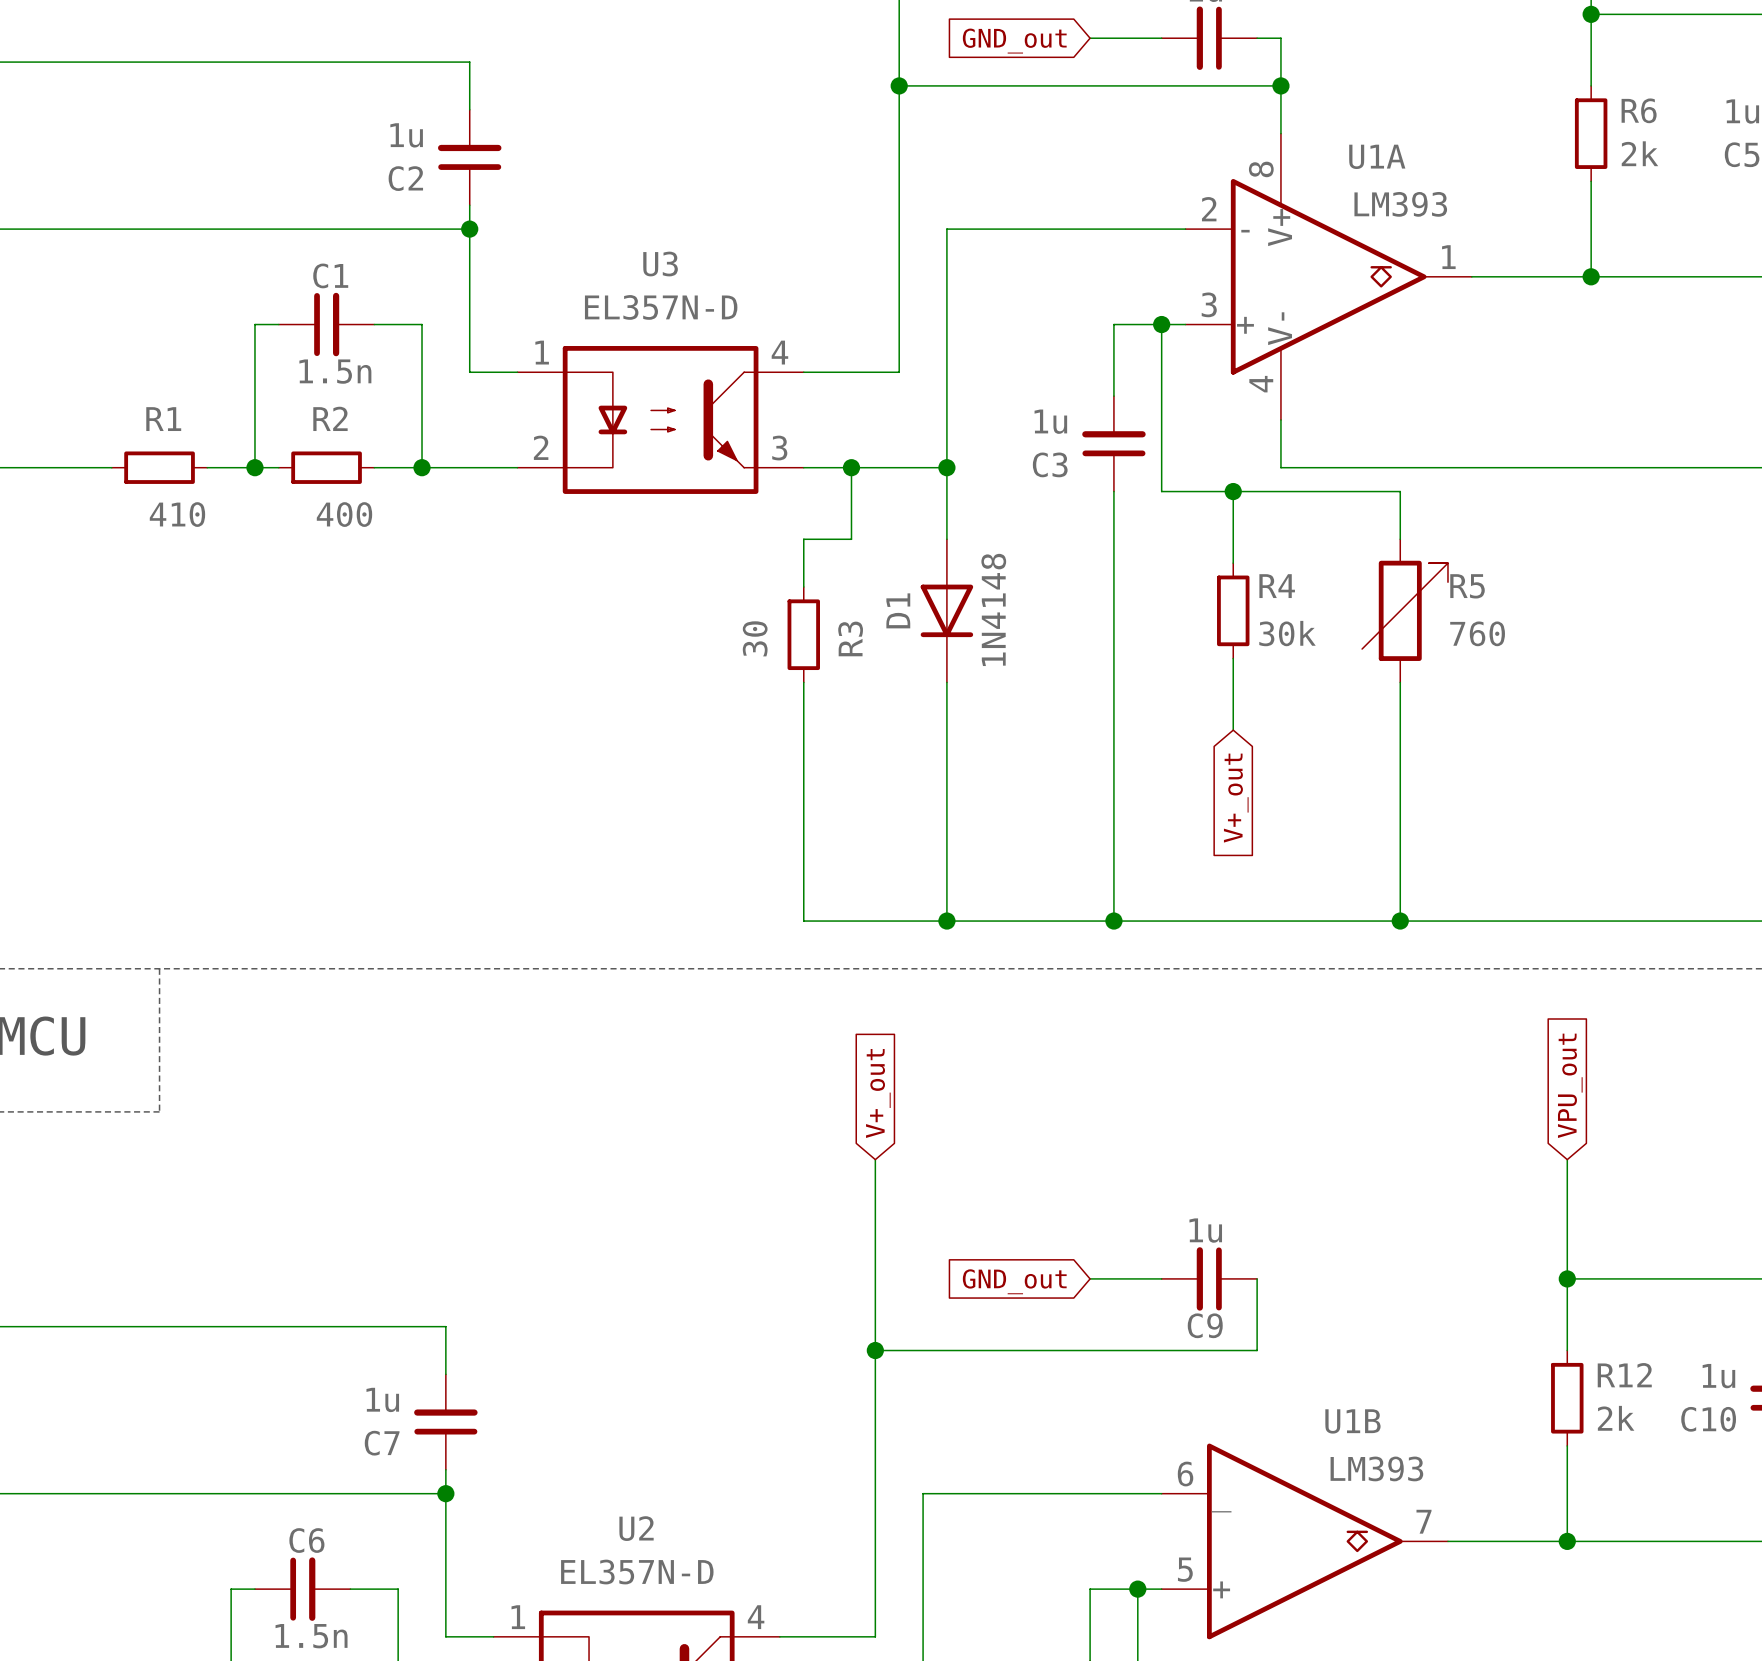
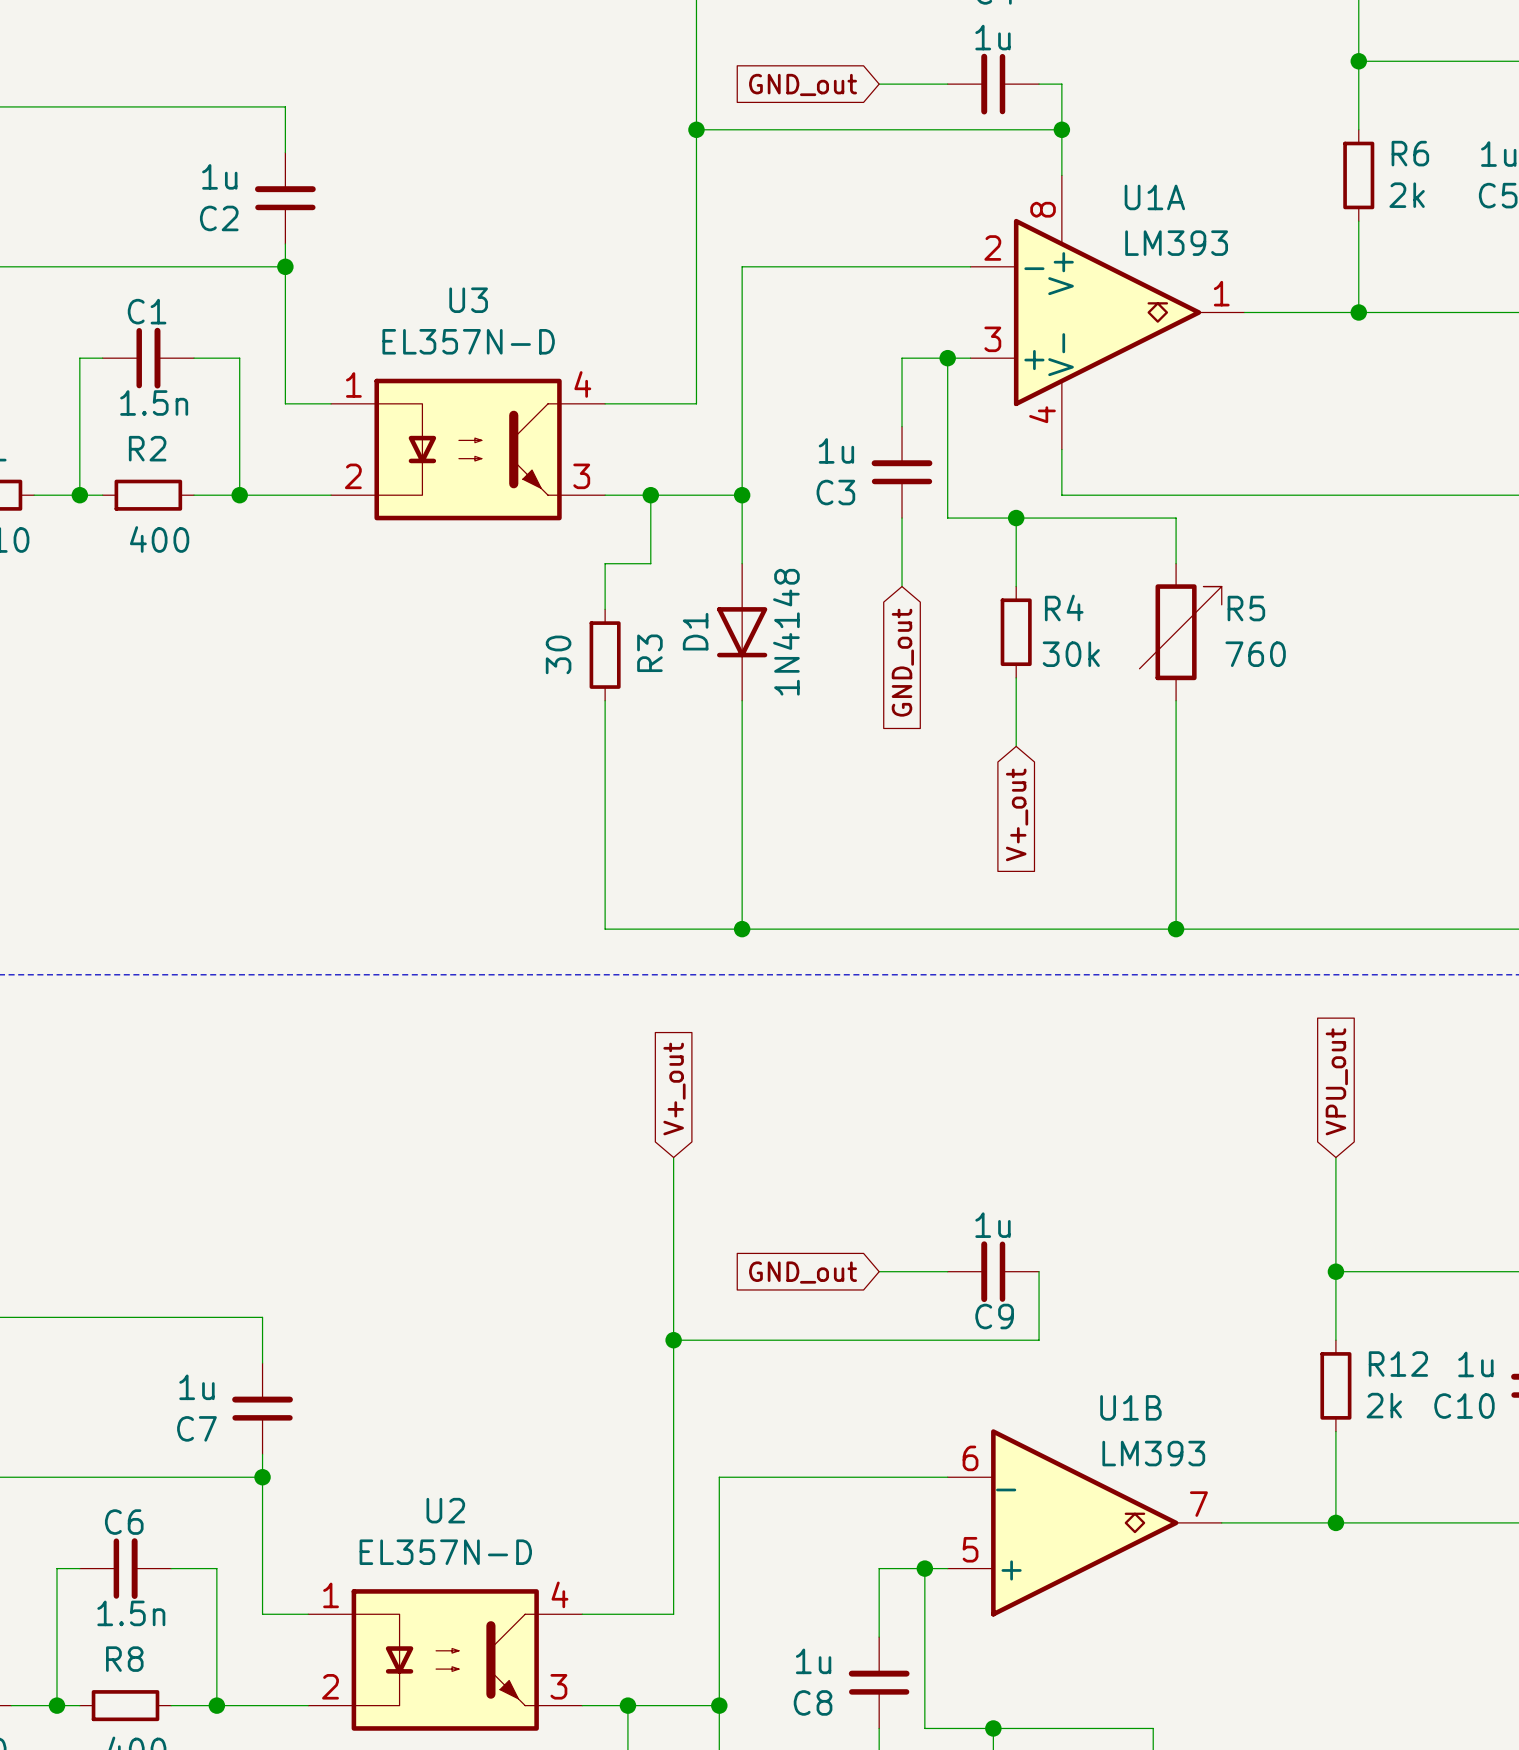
wire: (1113, 563) (1113, 921) -> none
global label: none -> GND_out (902, 662)
junction: (1113, 921) -> none

